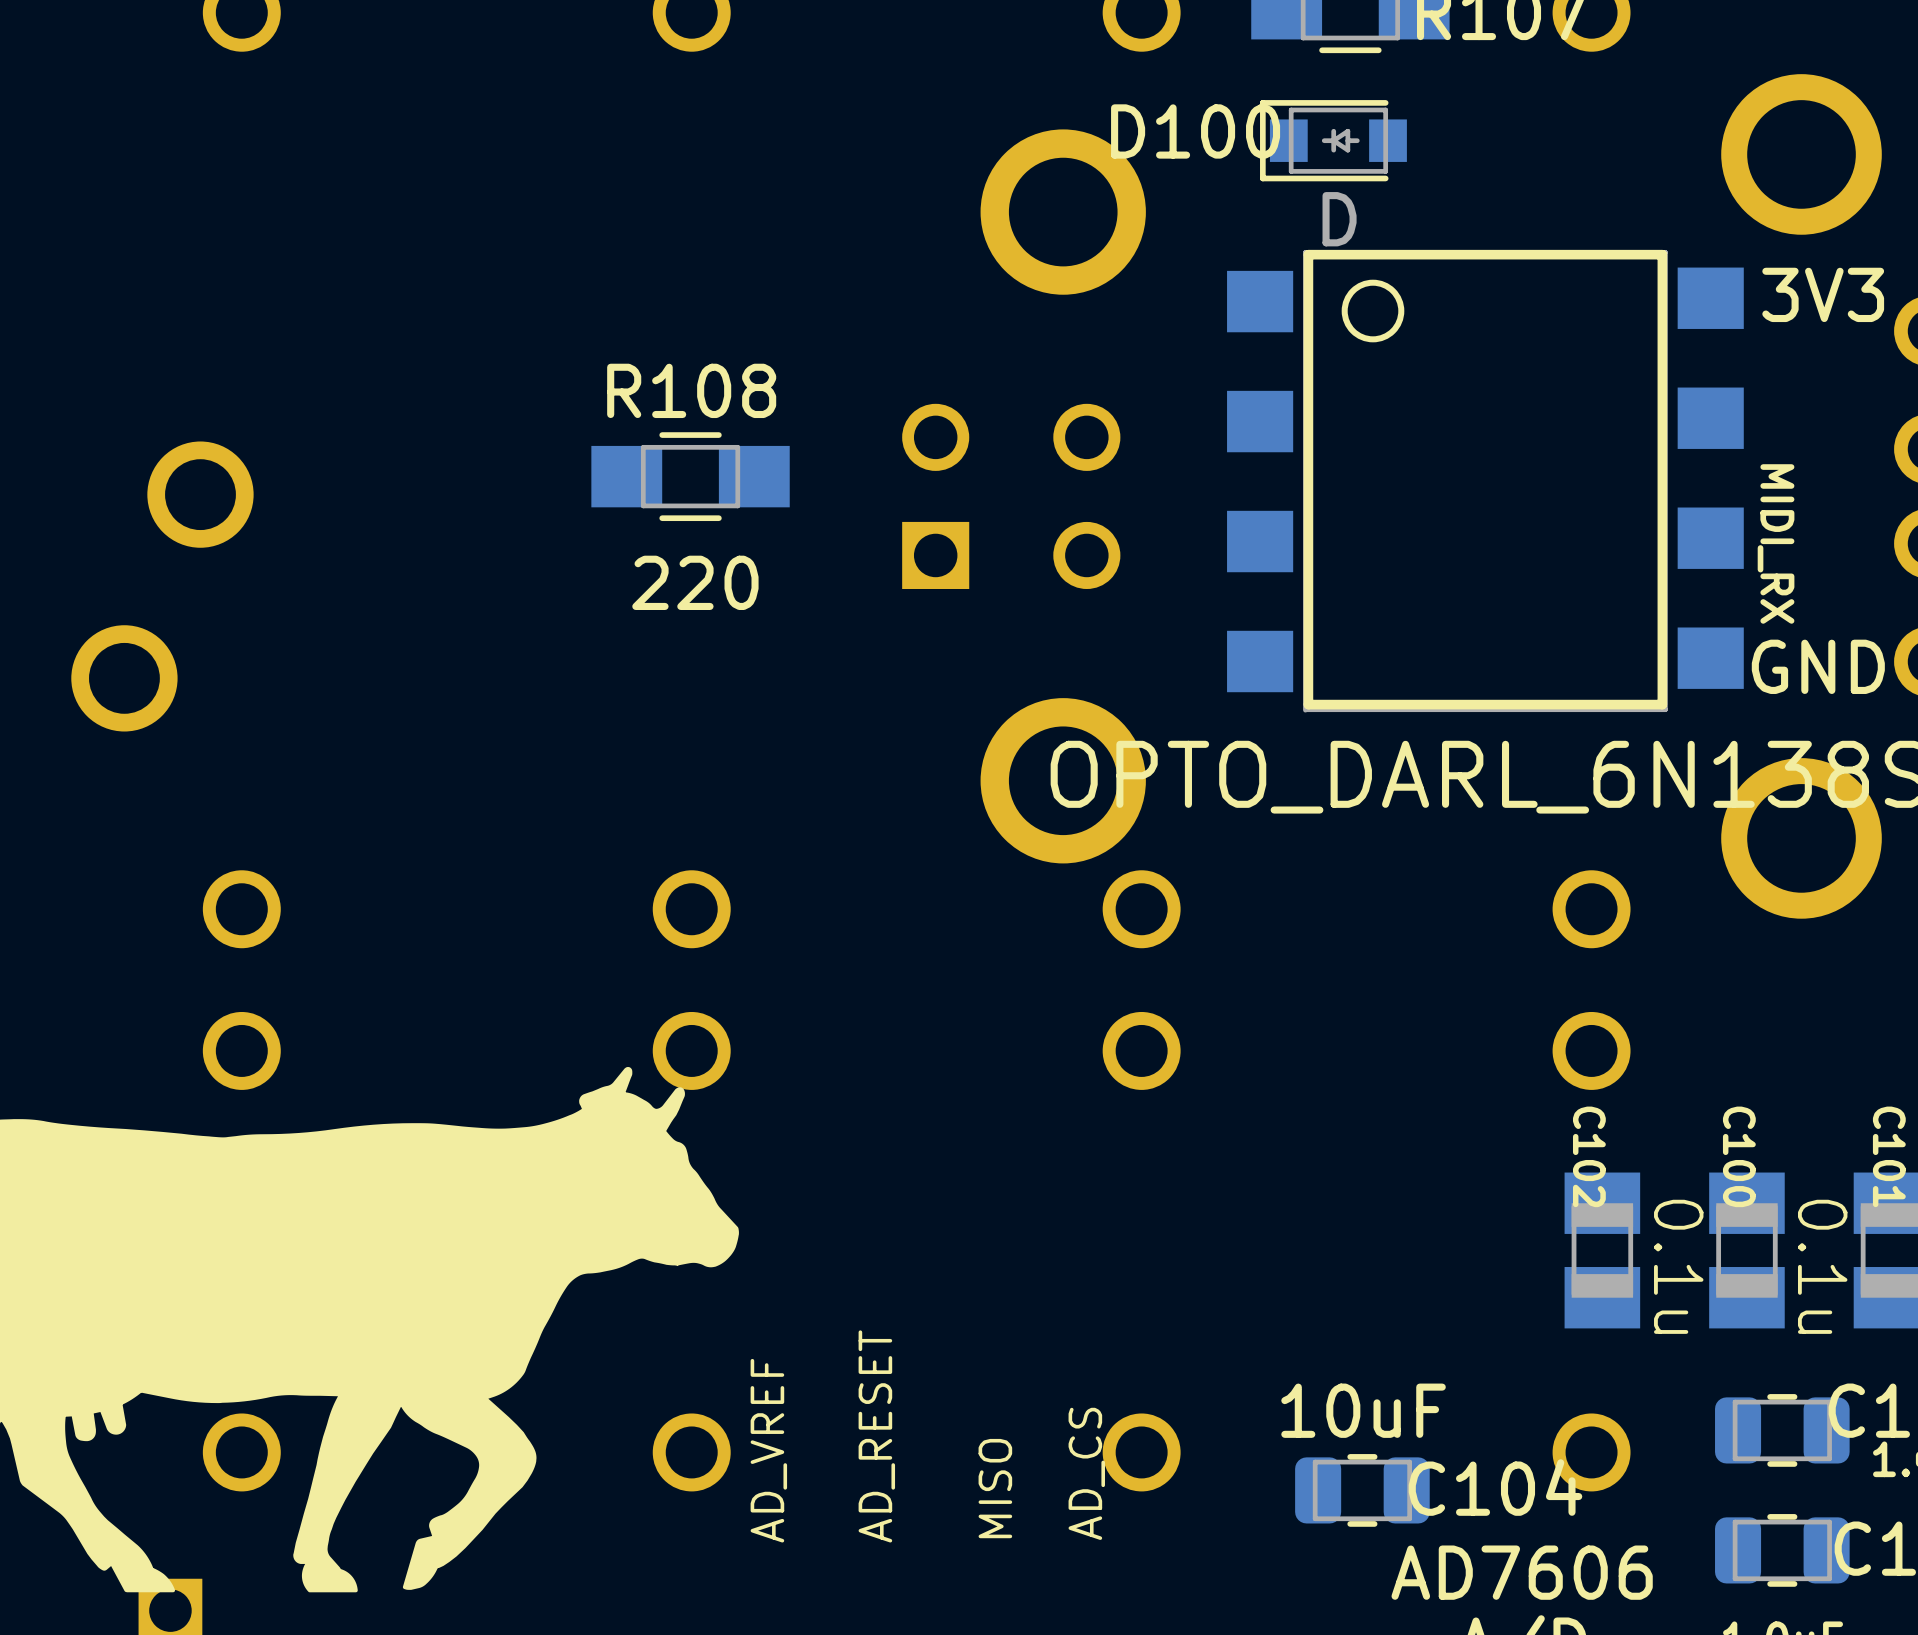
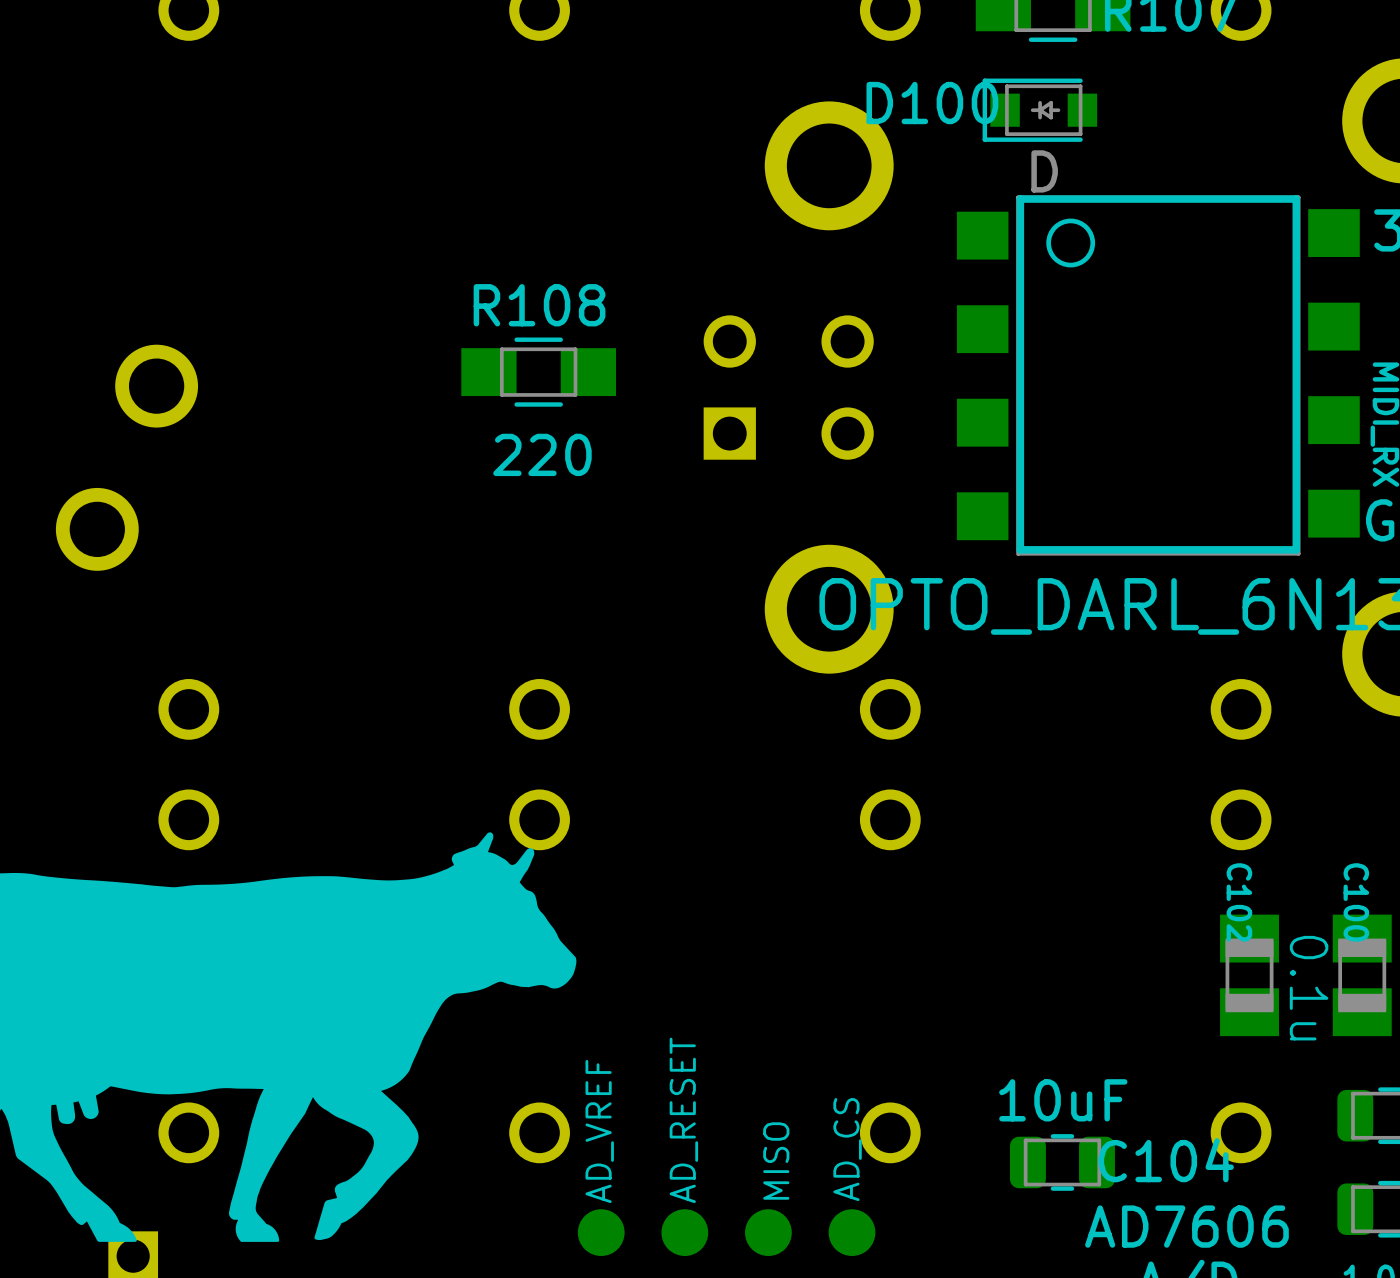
part: none -> (601, 1232)
part: none -> (684, 1232)
part: none -> (768, 1232)
part: none -> (852, 1232)

